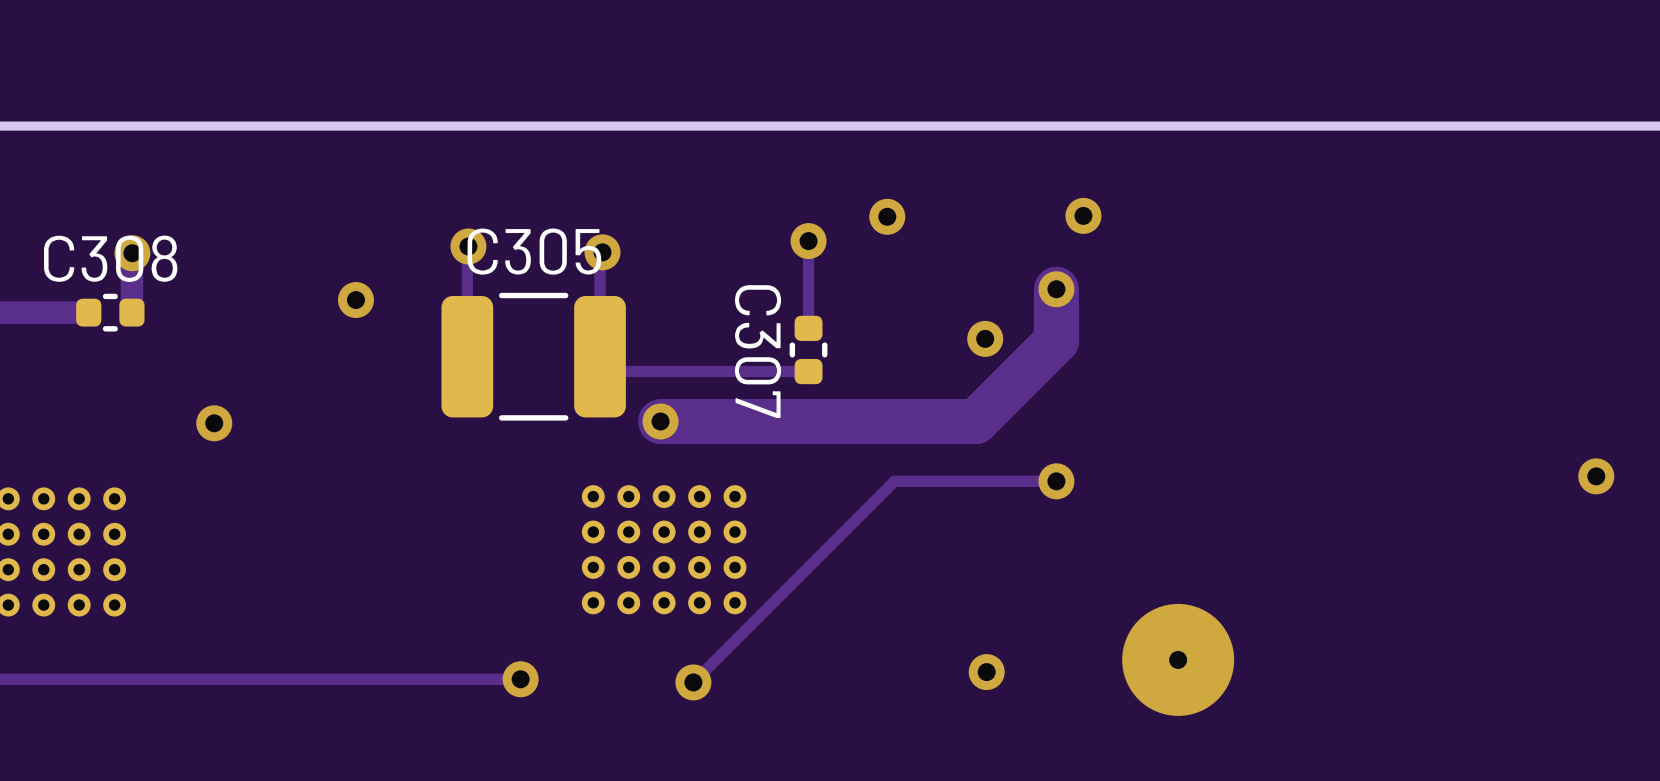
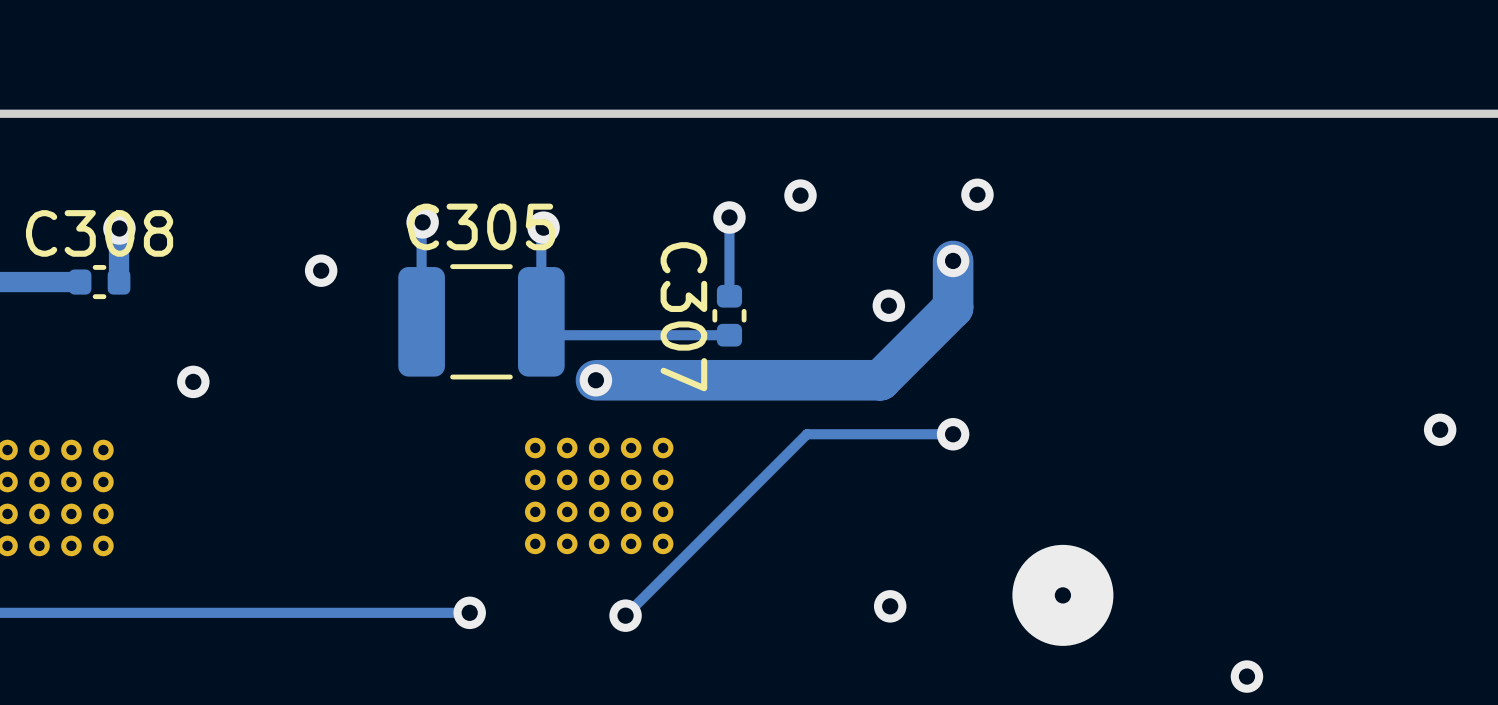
via: none -> (1246, 676)

